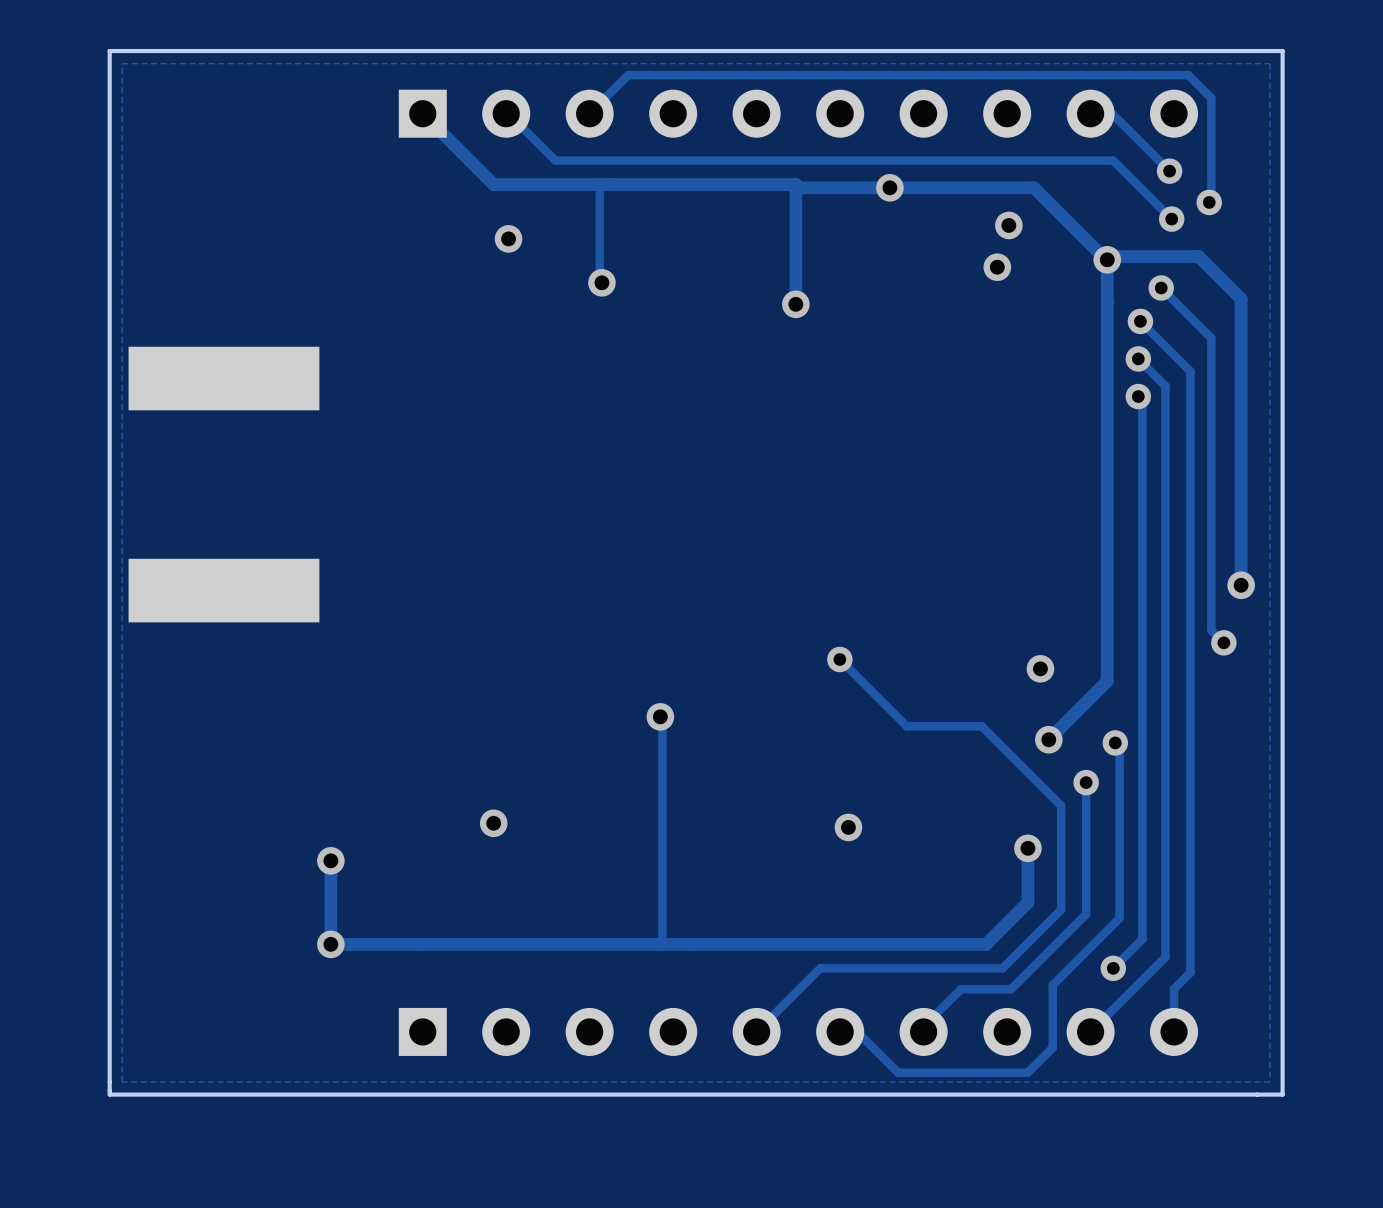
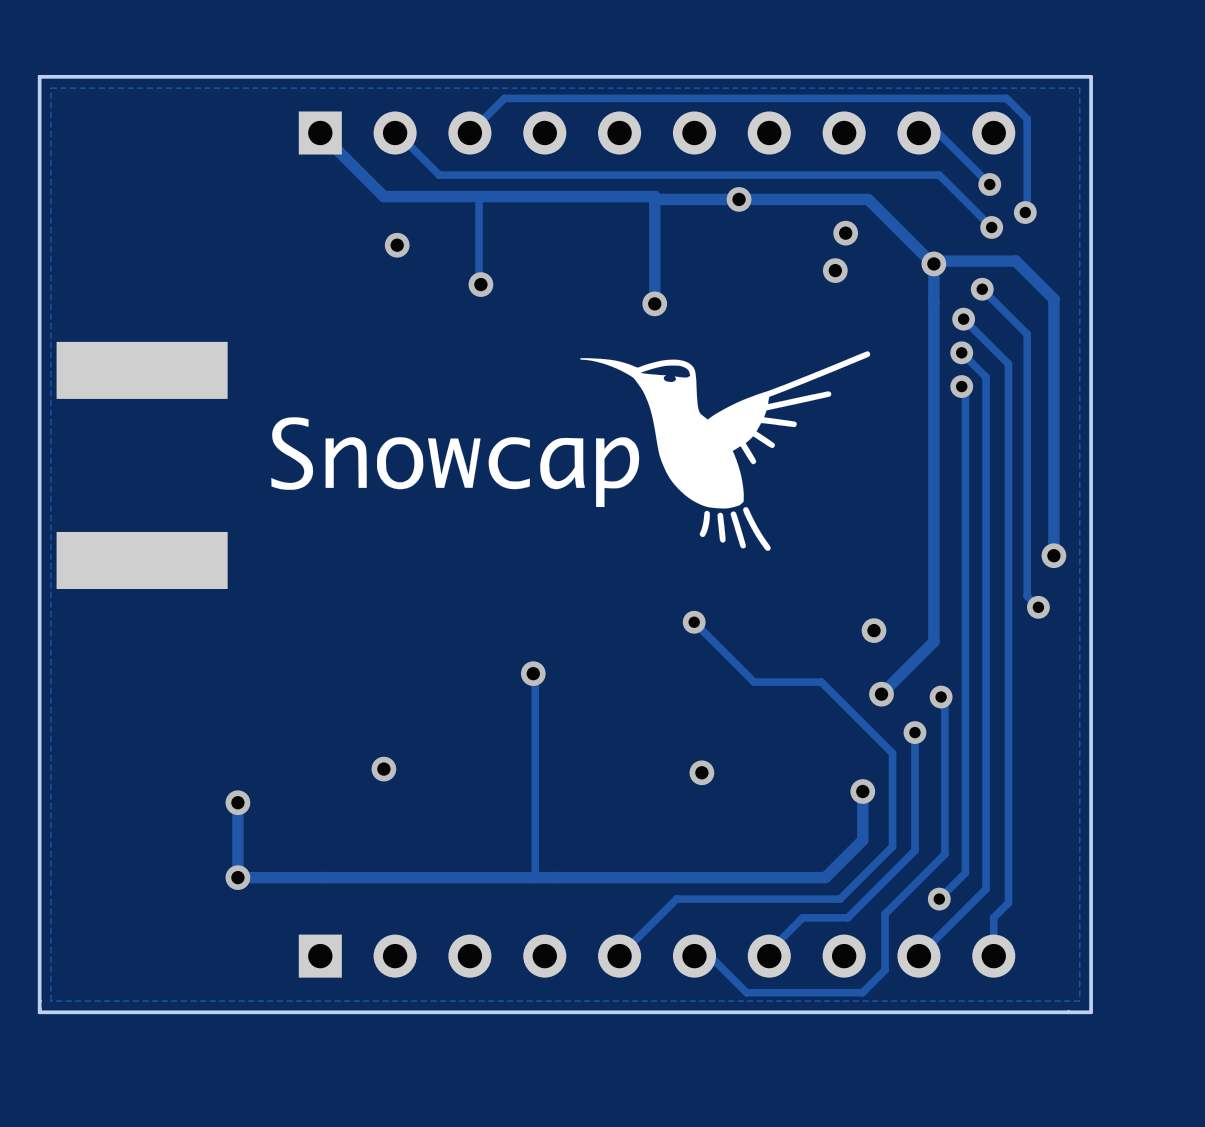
drawing: none -> [271, 351, 871, 551]

